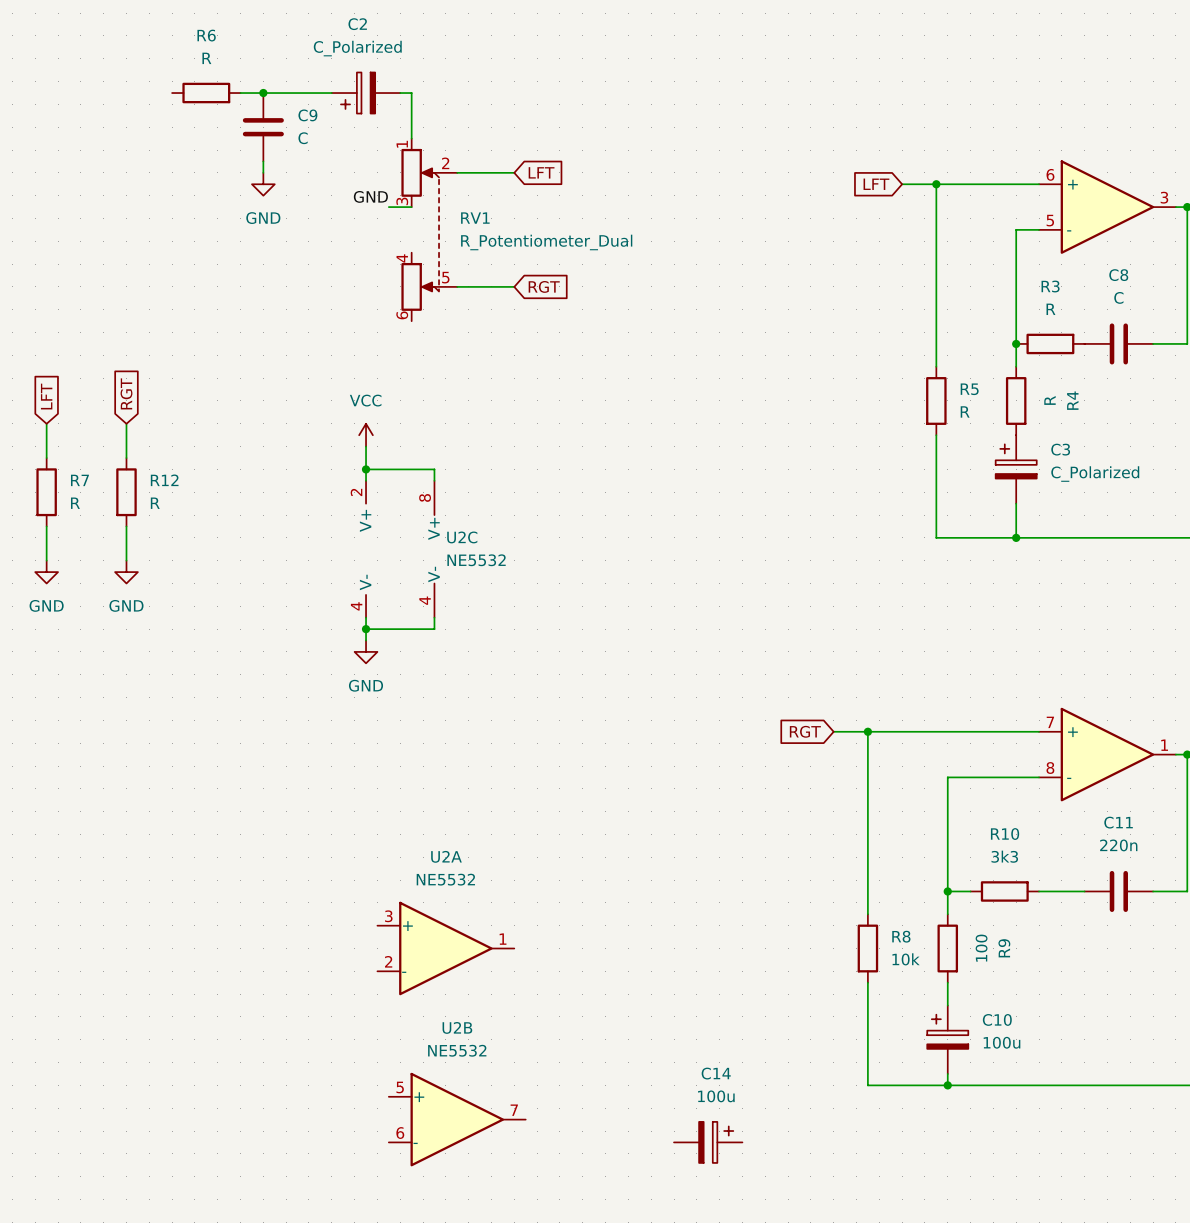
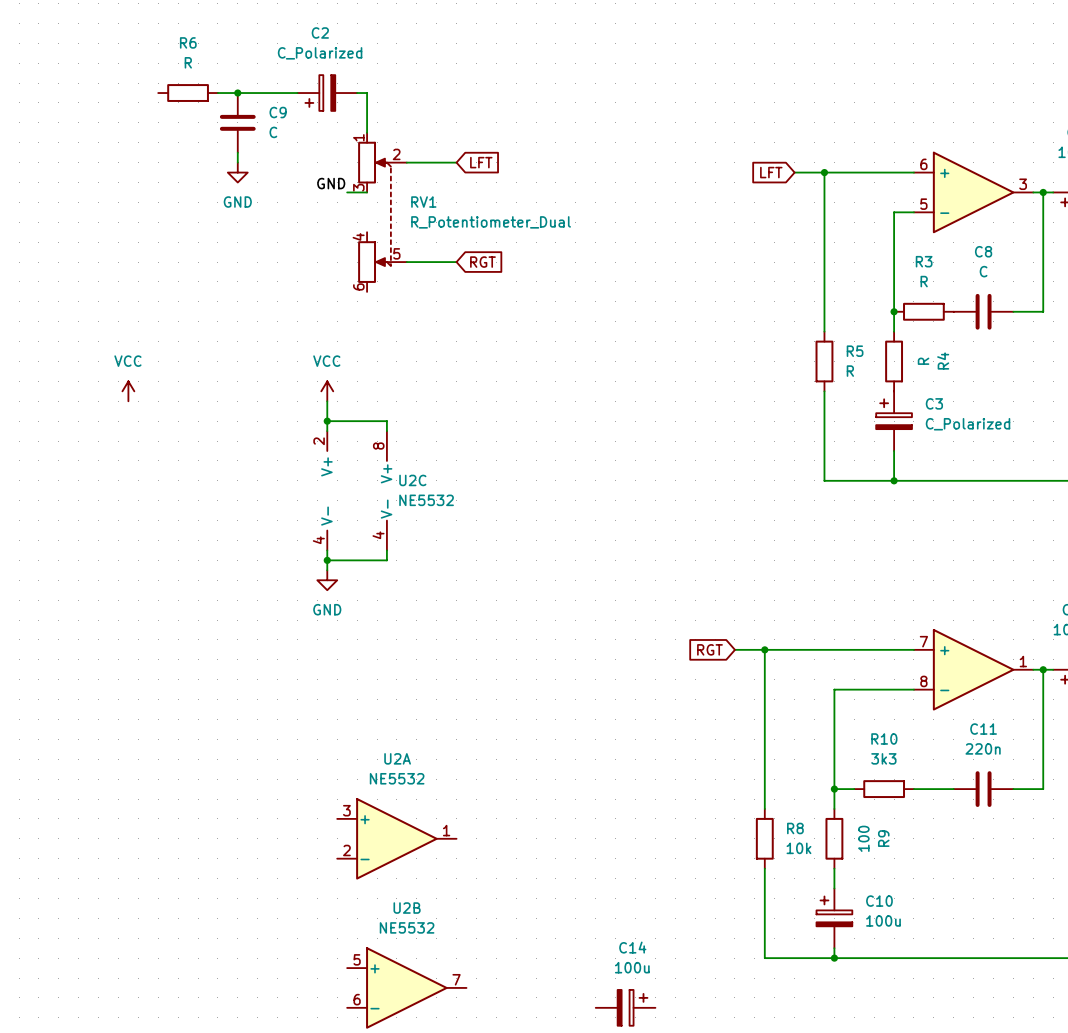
global label: RGT (126, 393) -> none
global label: LFT (46, 396) -> none
wire: (46, 423) (46, 458) -> none
wire: (126, 423) (126, 458) -> none
power symbol: none -> VCC (128, 391)
R7: R (46, 492) -> none
R12: R (126, 492) -> none
wire: (46, 526) (46, 560) -> none
wire: (126, 526) (126, 560) -> none
power symbol: GND (46, 572) -> none
power symbol: GND (126, 572) -> none

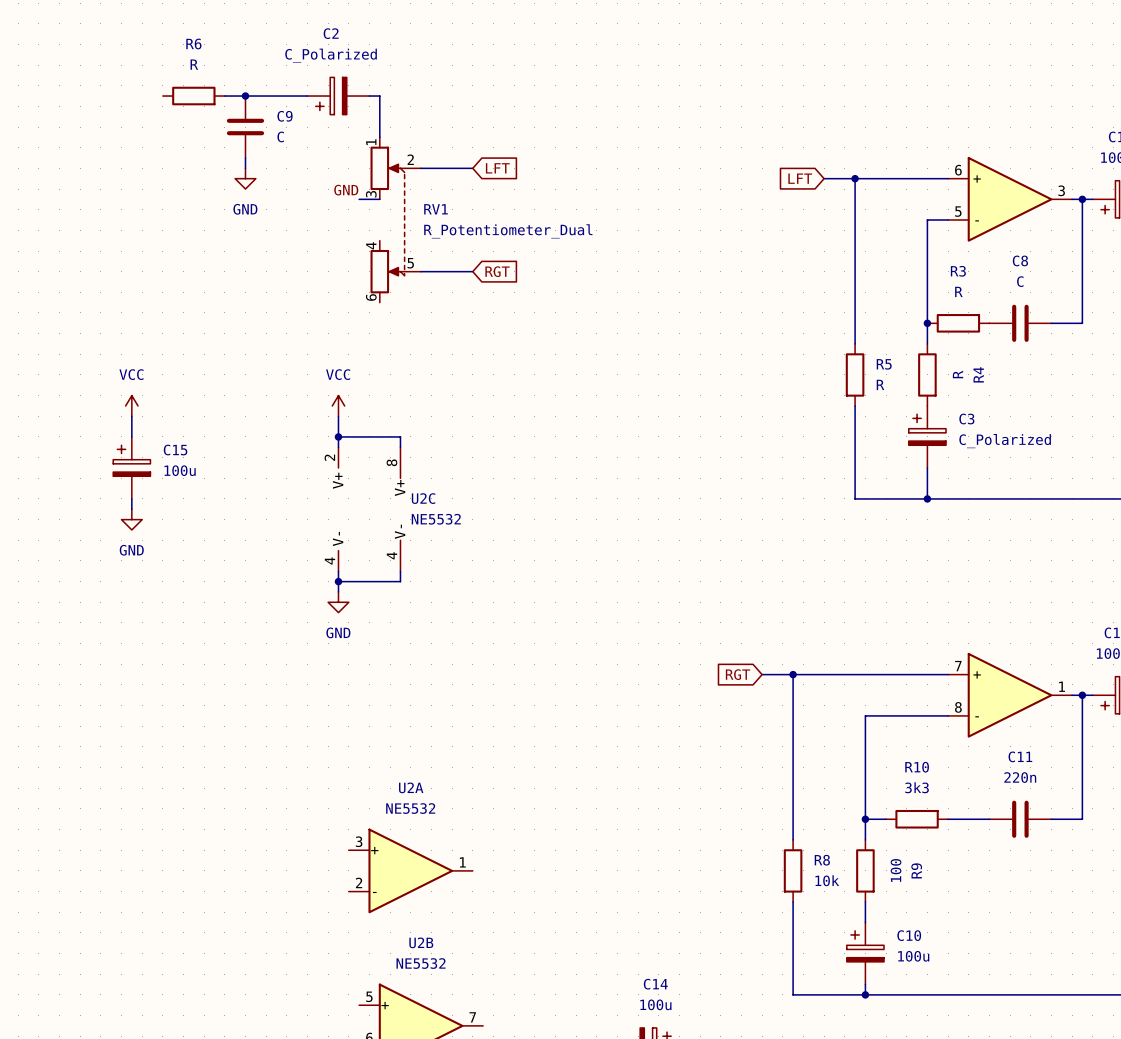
wire: none -> (131, 416) (131, 436)
C15: none -> 100u (131, 467)
wire: none -> (131, 498) (131, 509)
power symbol: none -> GND (131, 519)

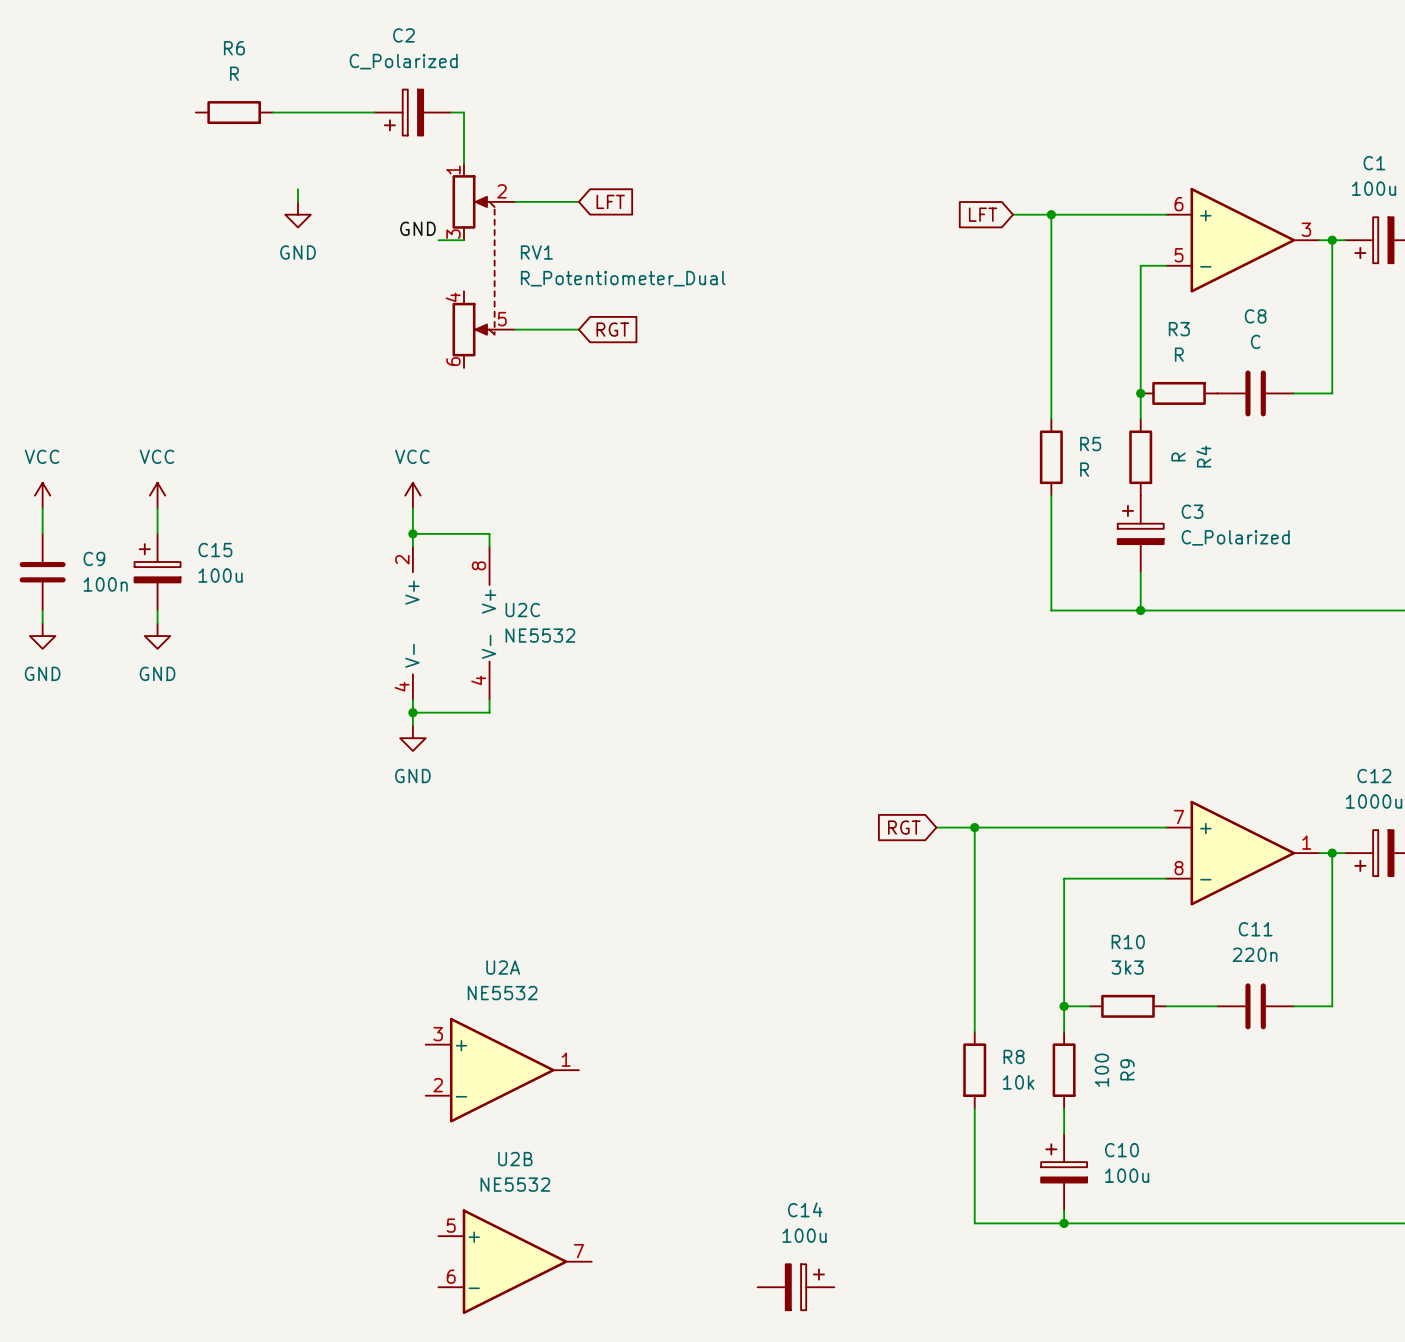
junction: (245, 96) -> none
C9 position: (245, 127) -> (42, 572)
C9 value: C (280, 136) -> 100n (105, 584)
power symbol: none -> VCC (42, 495)
wire: none -> (42, 508) (42, 533)
wire: none -> (42, 610) (42, 623)
power symbol: none -> GND (42, 636)

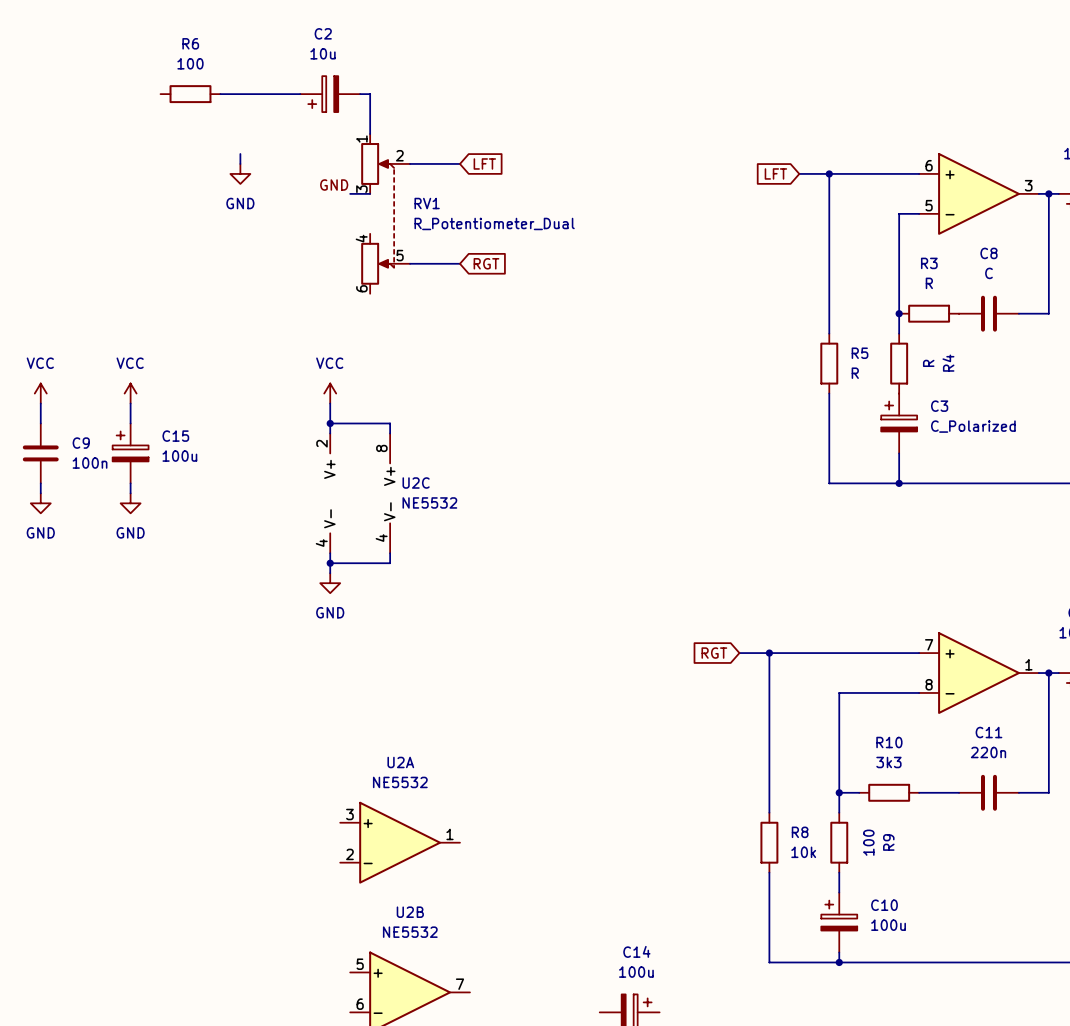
C2 value: C_Polarized (403, 61) -> 10u (323, 53)
R6 value: R (234, 73) -> 100 (190, 63)

